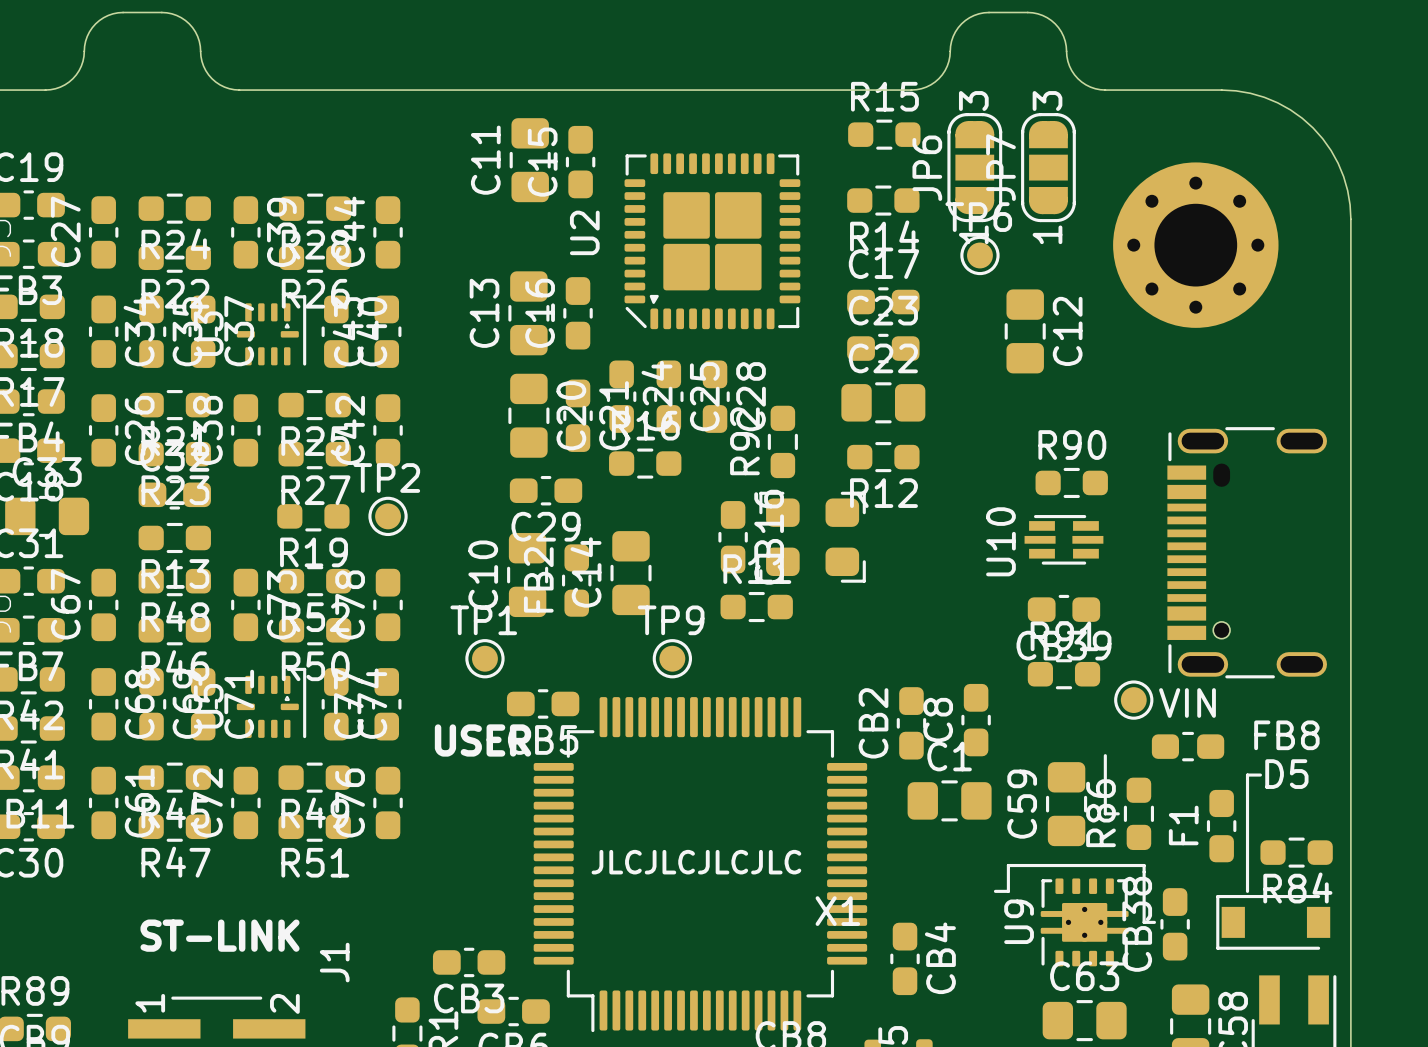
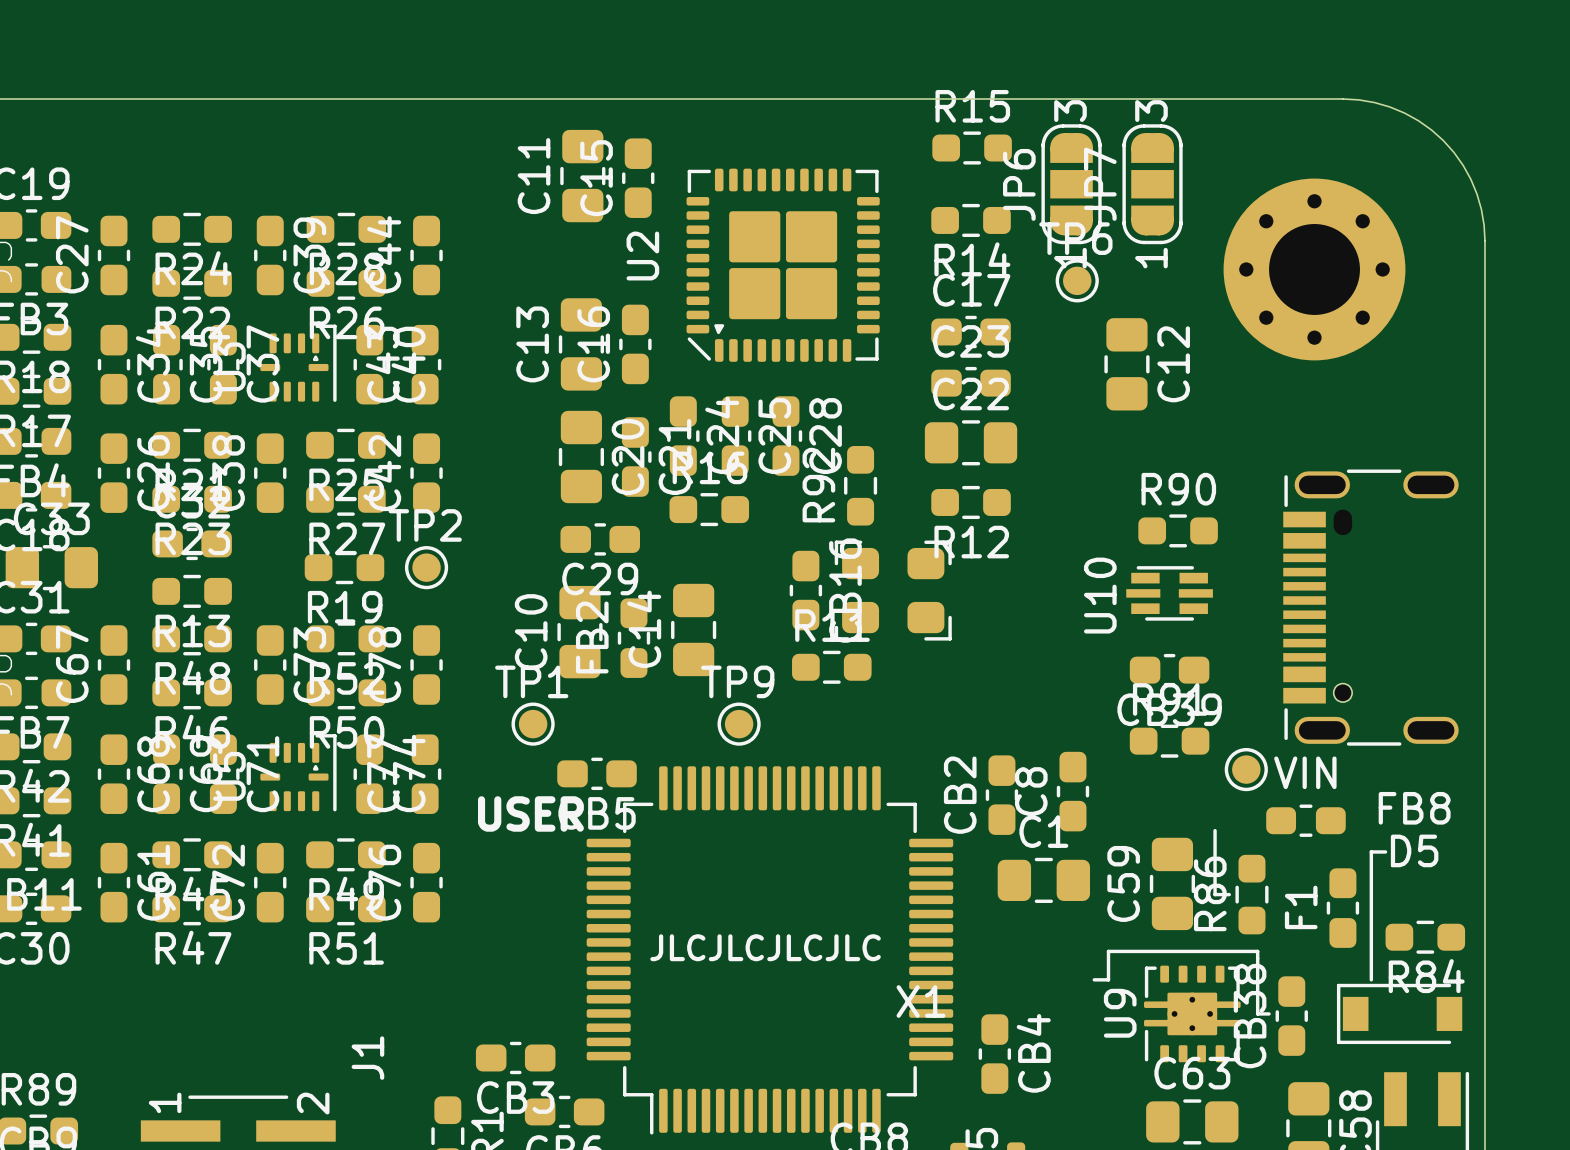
board edge: (45, 90) (60, 87) (72, 78) (81, 66) (85, 41) (92, 27) (103, 17) (123, 12) (166, 12) (181, 17) (192, 27) (197, 36) (201, 61) (208, 74) (224, 87) (239, 90) -> (50, 98) (263, 98)
board edge: (911, 90) (926, 87) (938, 78) (947, 66) (951, 41) (958, 27) (969, 17) (989, 12) (1032, 12) (1047, 17) (1055, 23) (1063, 36) (1067, 61) (1074, 74) (1090, 87) (1105, 90) -> (1001, 98) (1215, 98)
text: ST-LINK (220, 935) -> none

